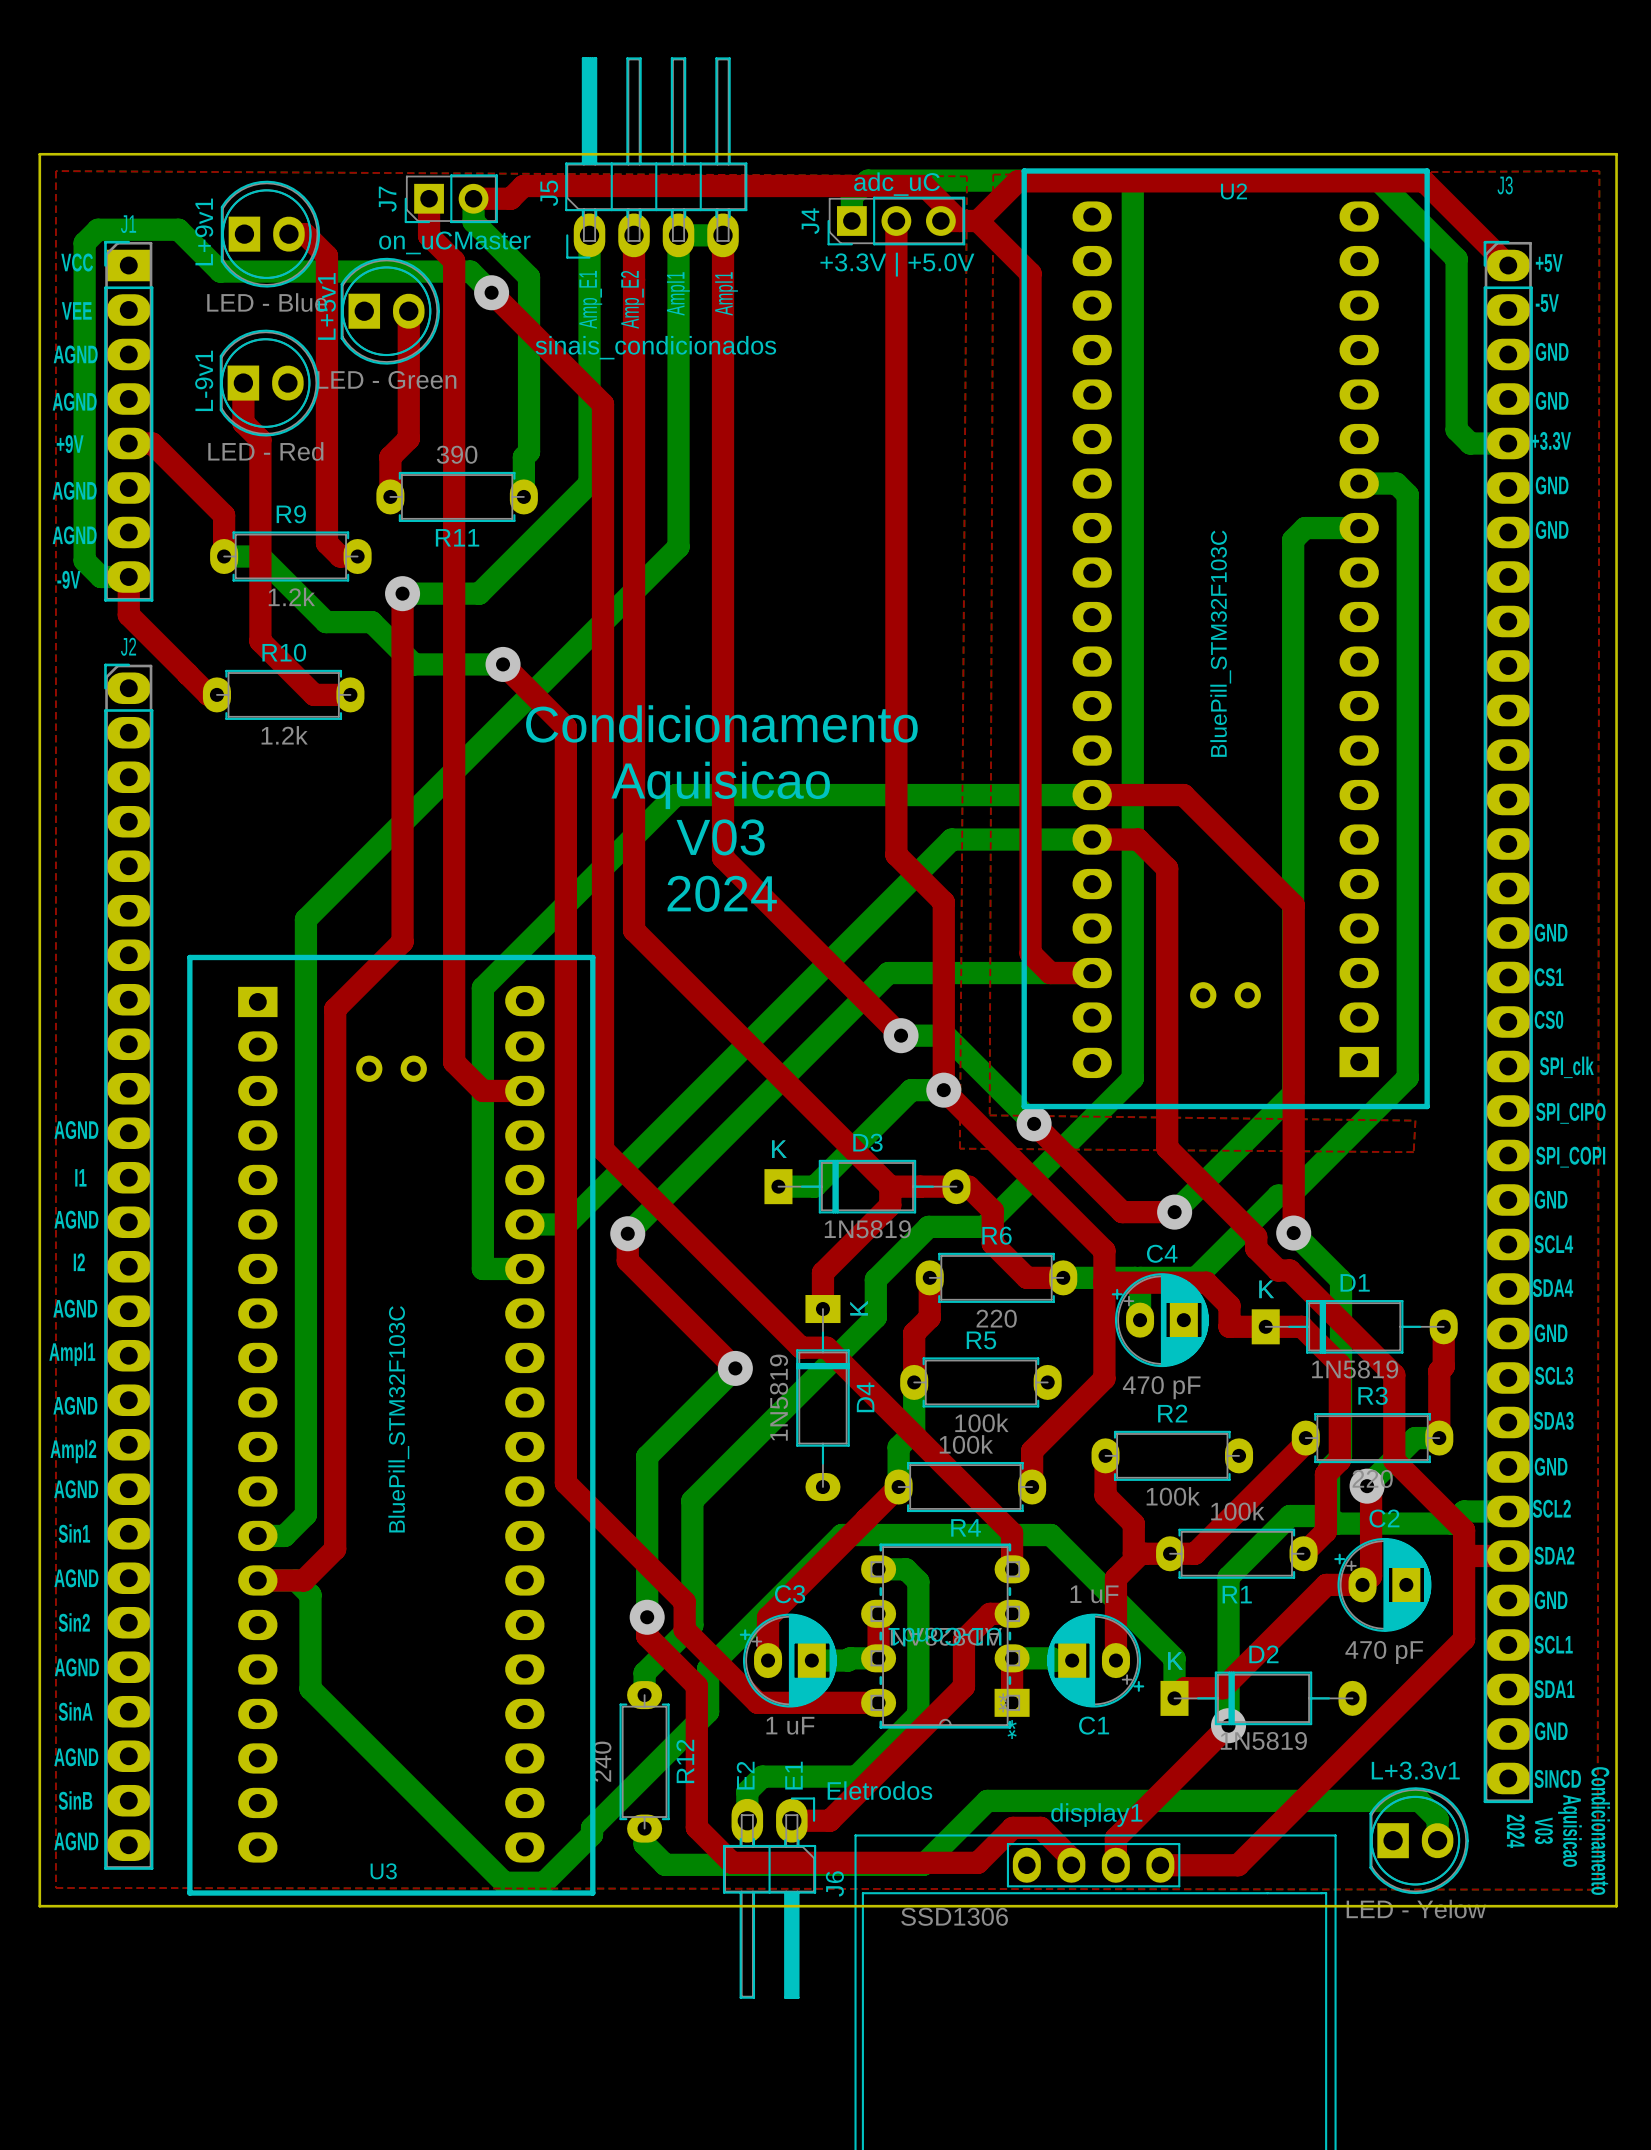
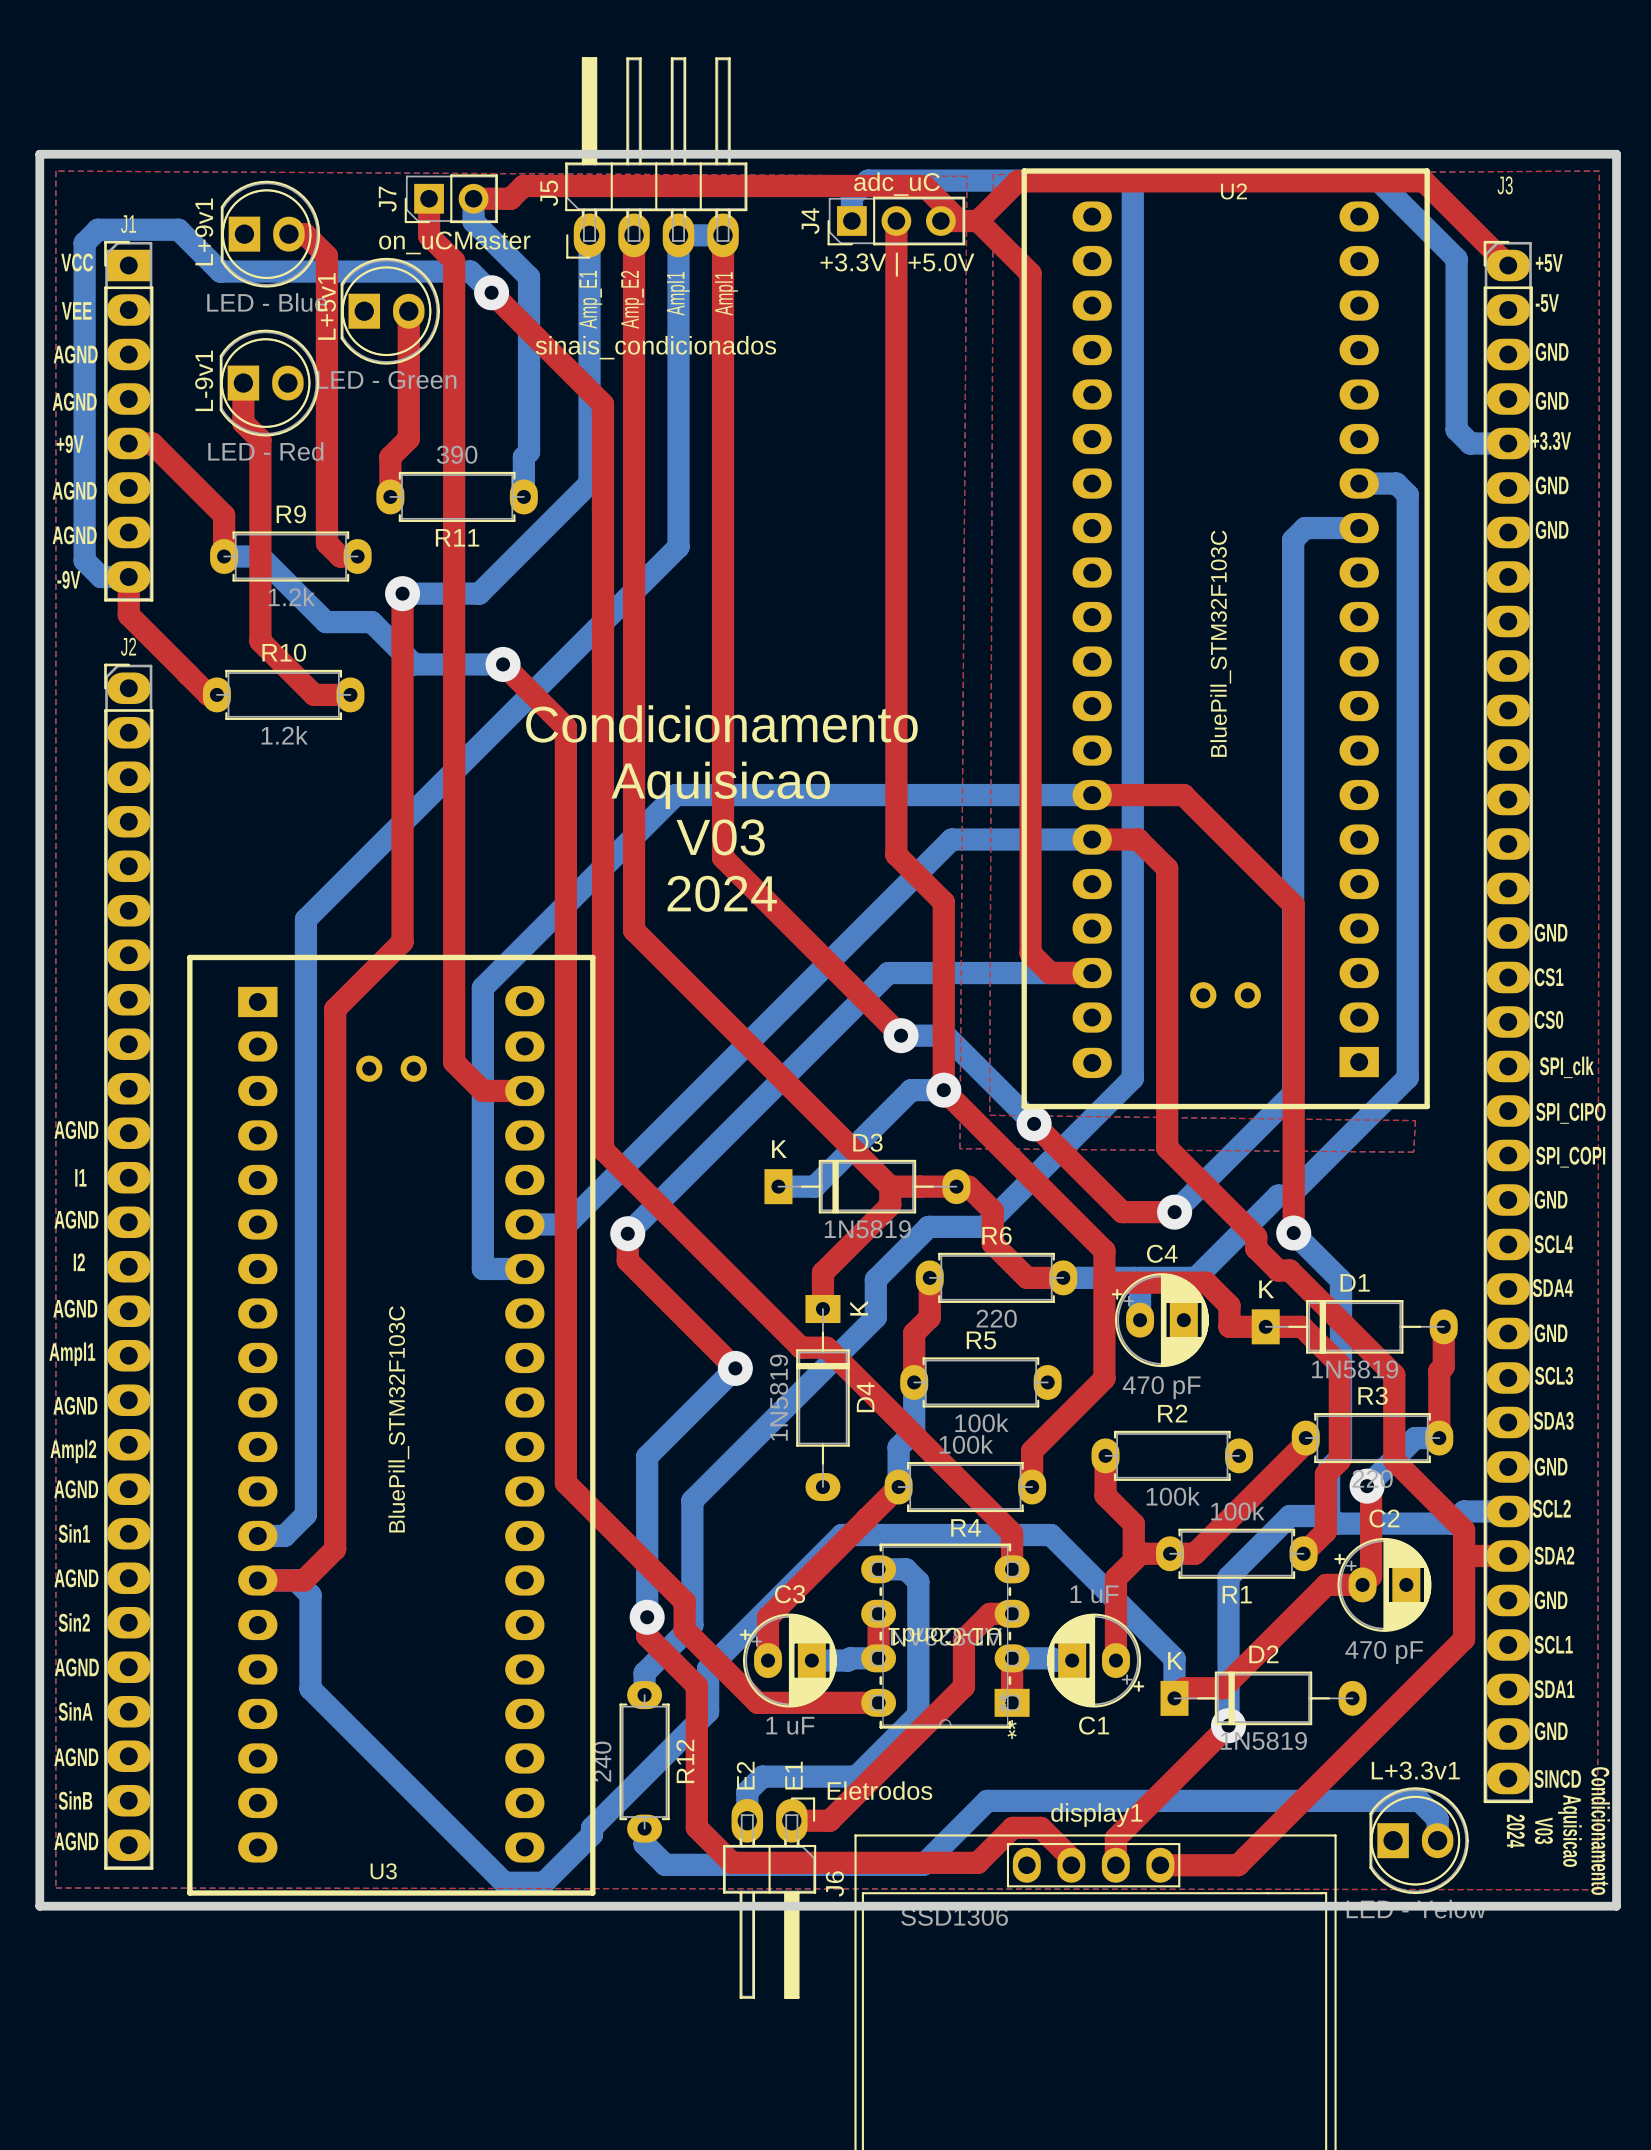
board edge width: thin (39, 154) (1616, 154) (1616, 1906) (39, 1906) (39, 154) -> thick (39, 154) (1616, 154) (1616, 1906) (39, 1906) (39, 154)

